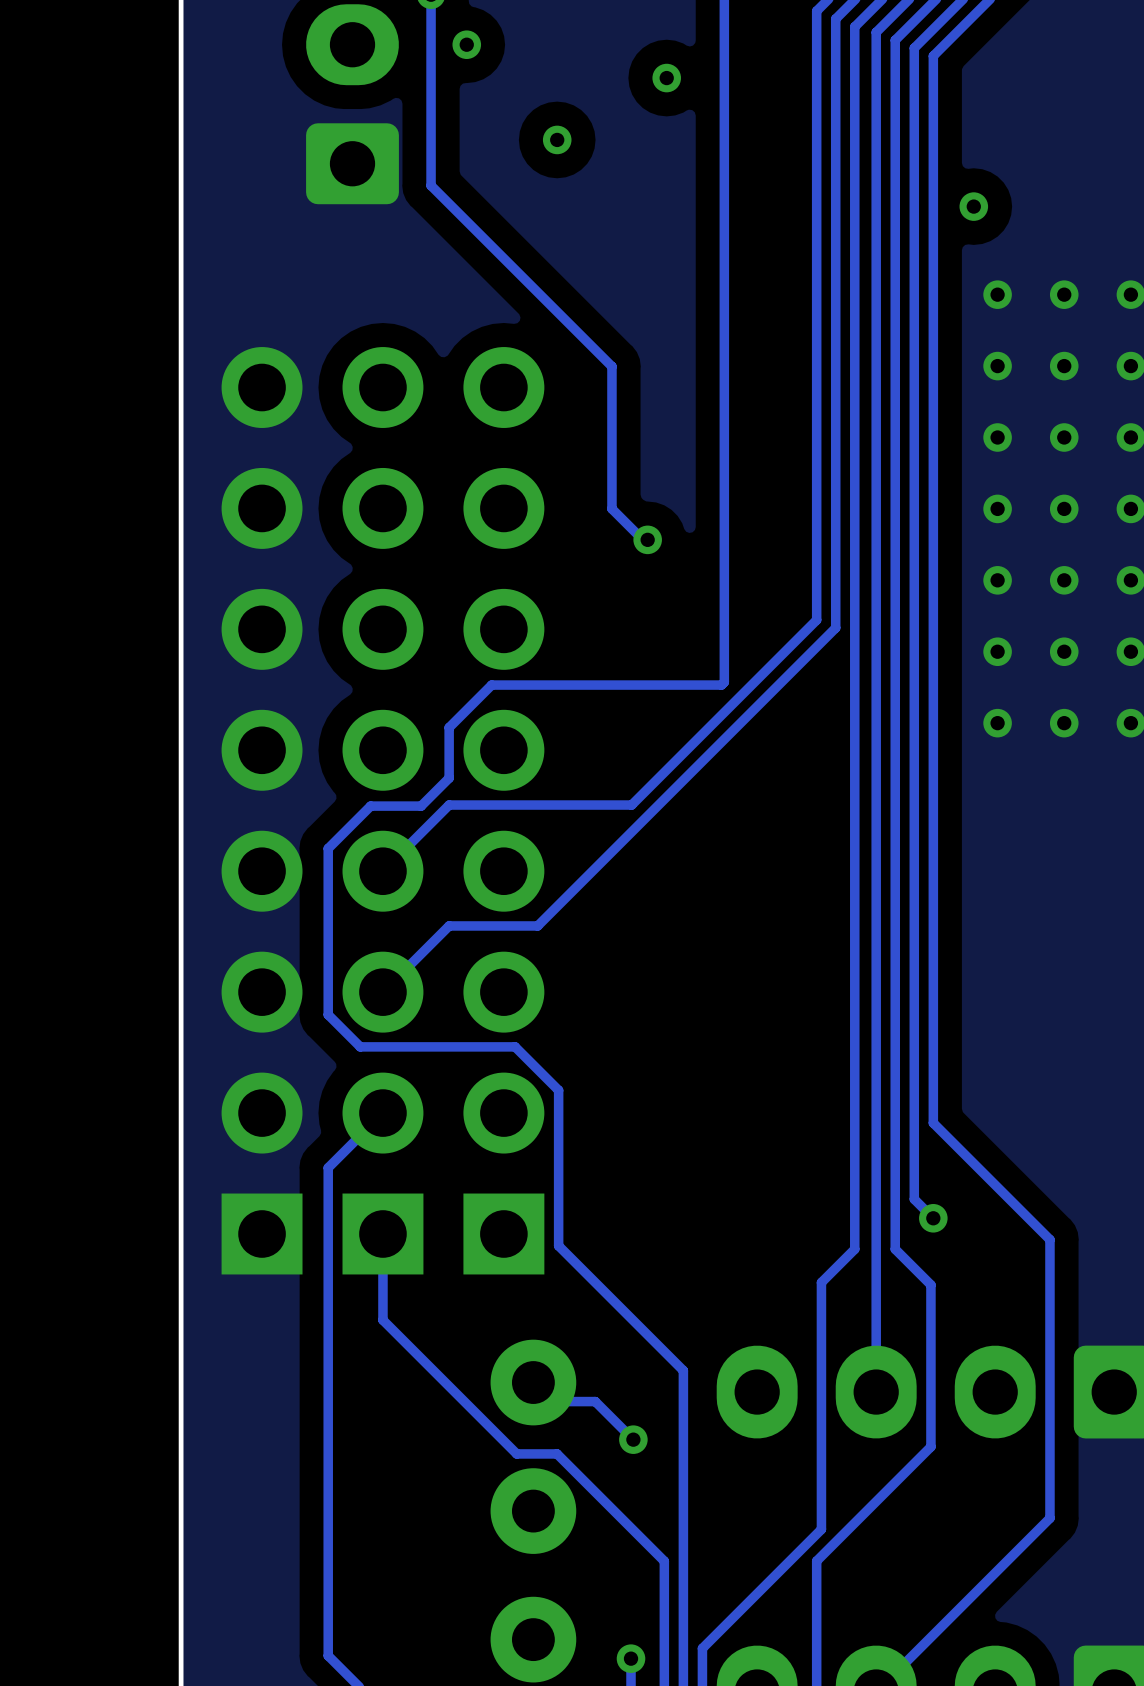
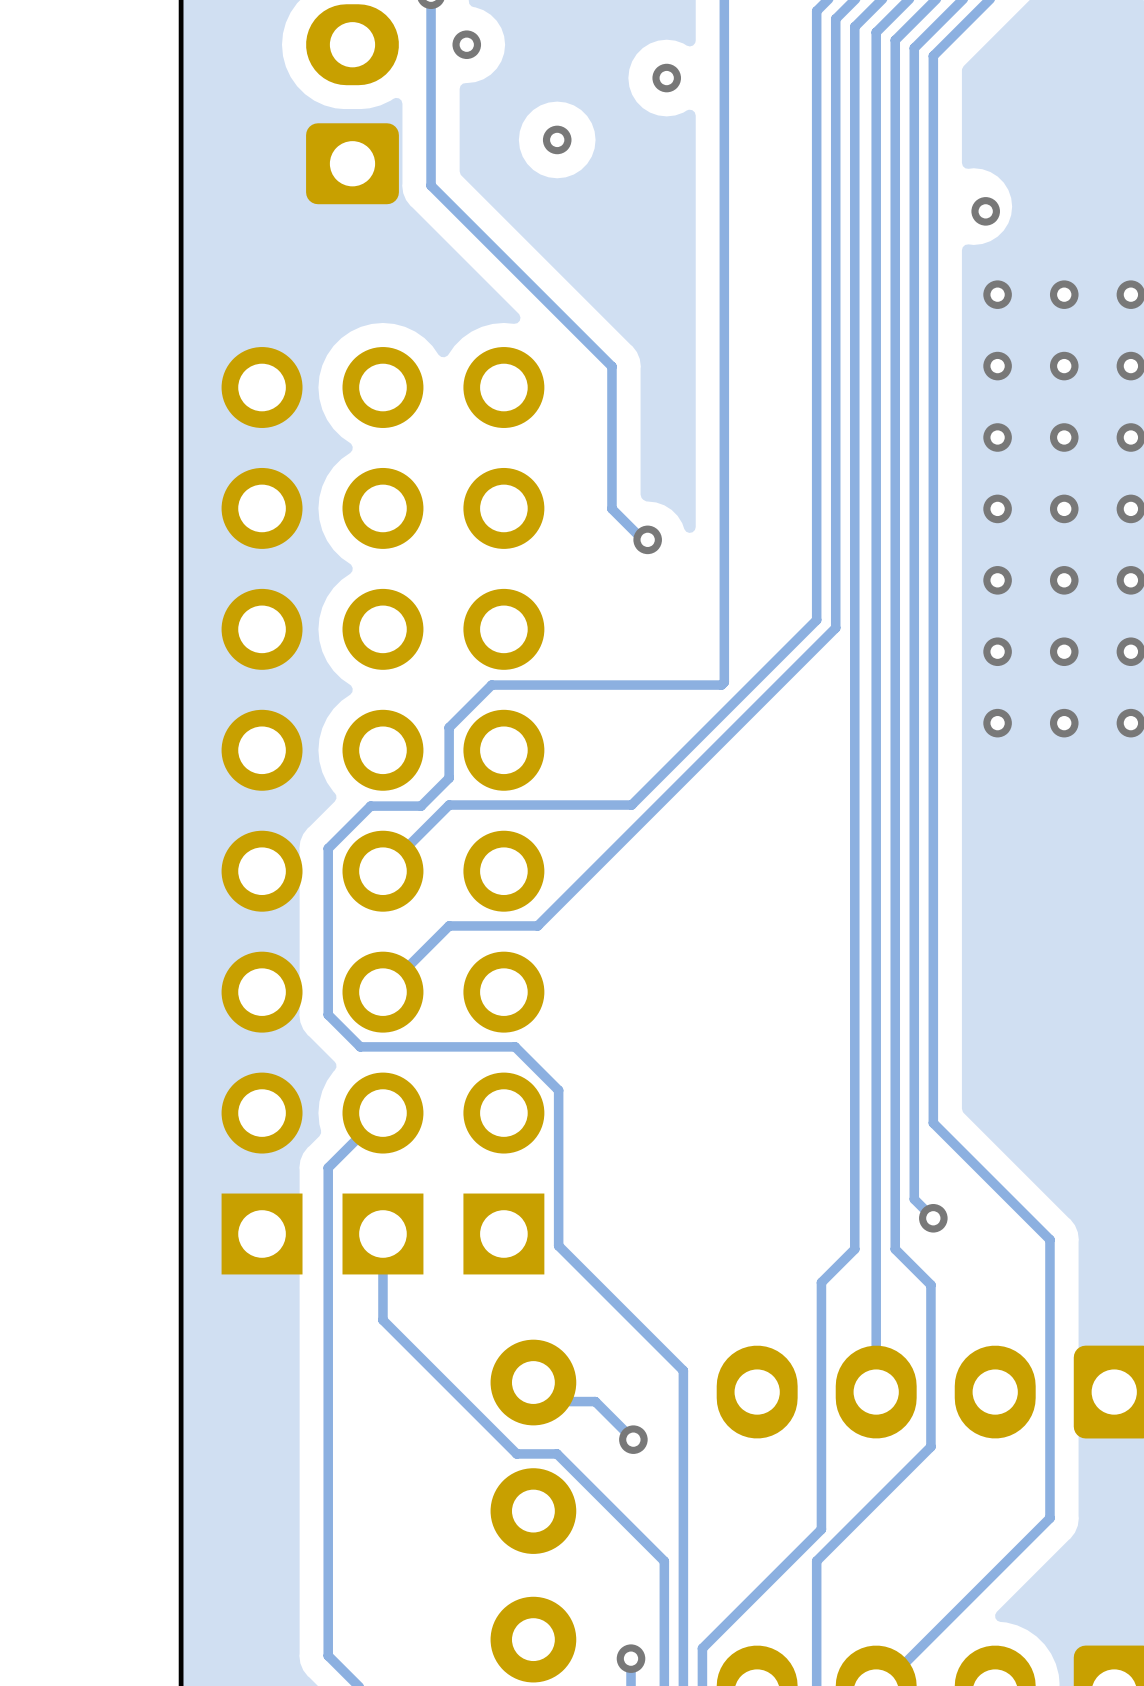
via position: (973, 206) -> (985, 211)

